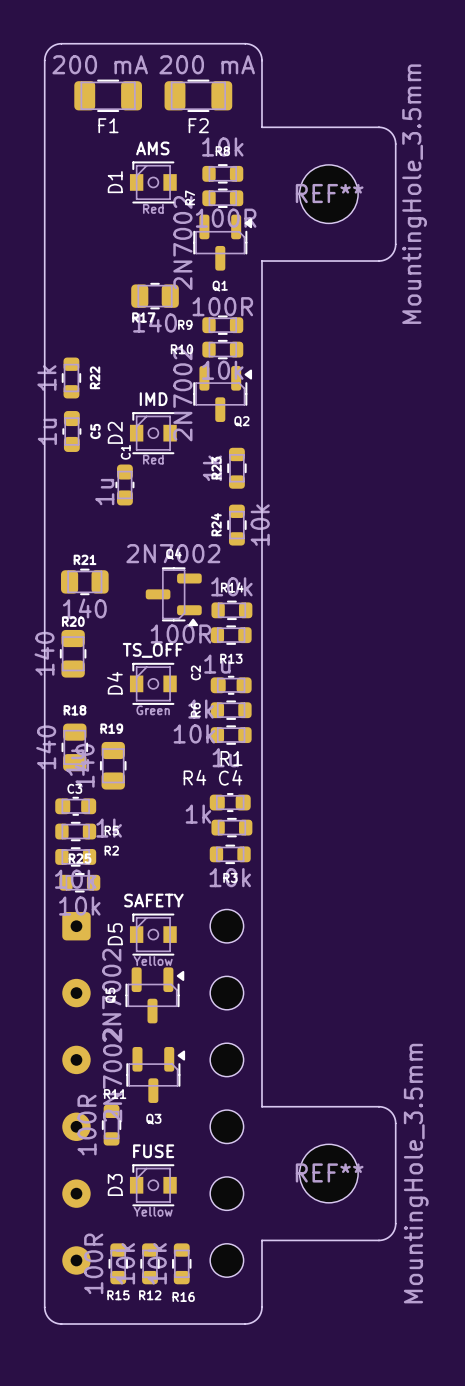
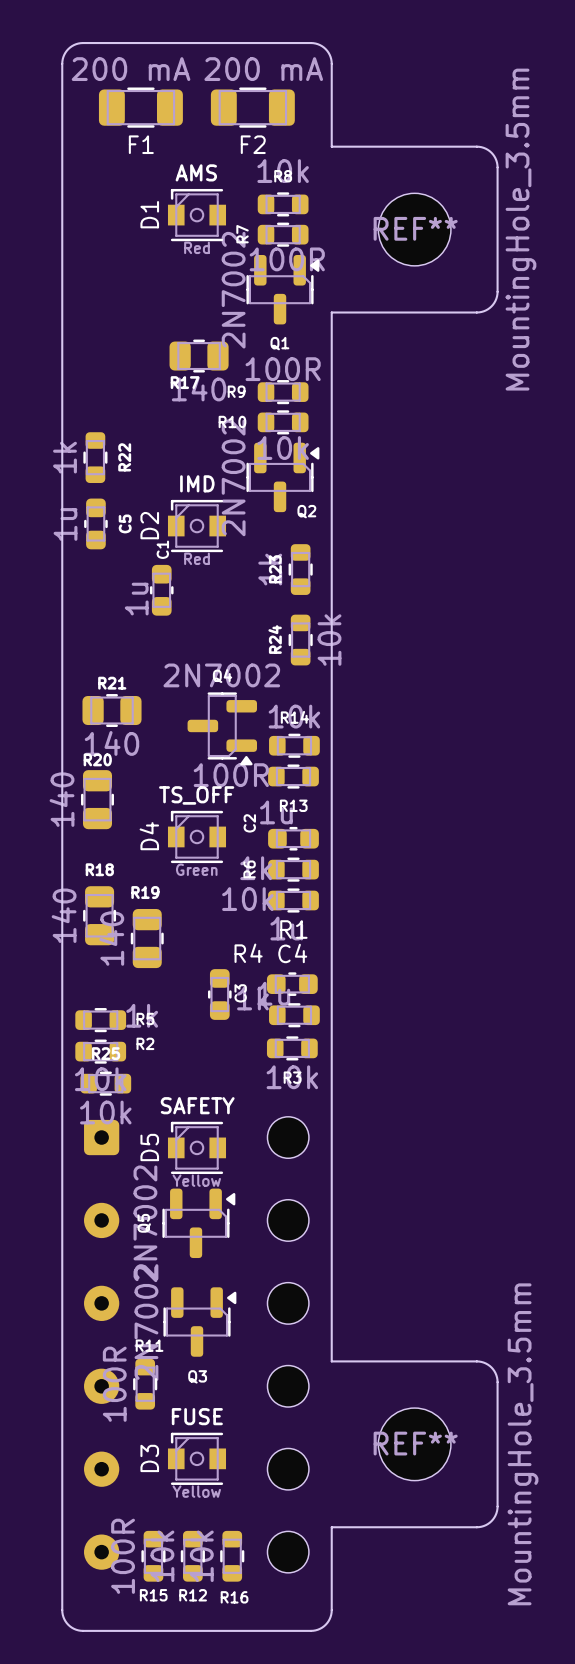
C3 rotation: 0° (75, 806) -> 90° clockwise (219, 994)
C3 position: (75, 806) -> (219, 994)

